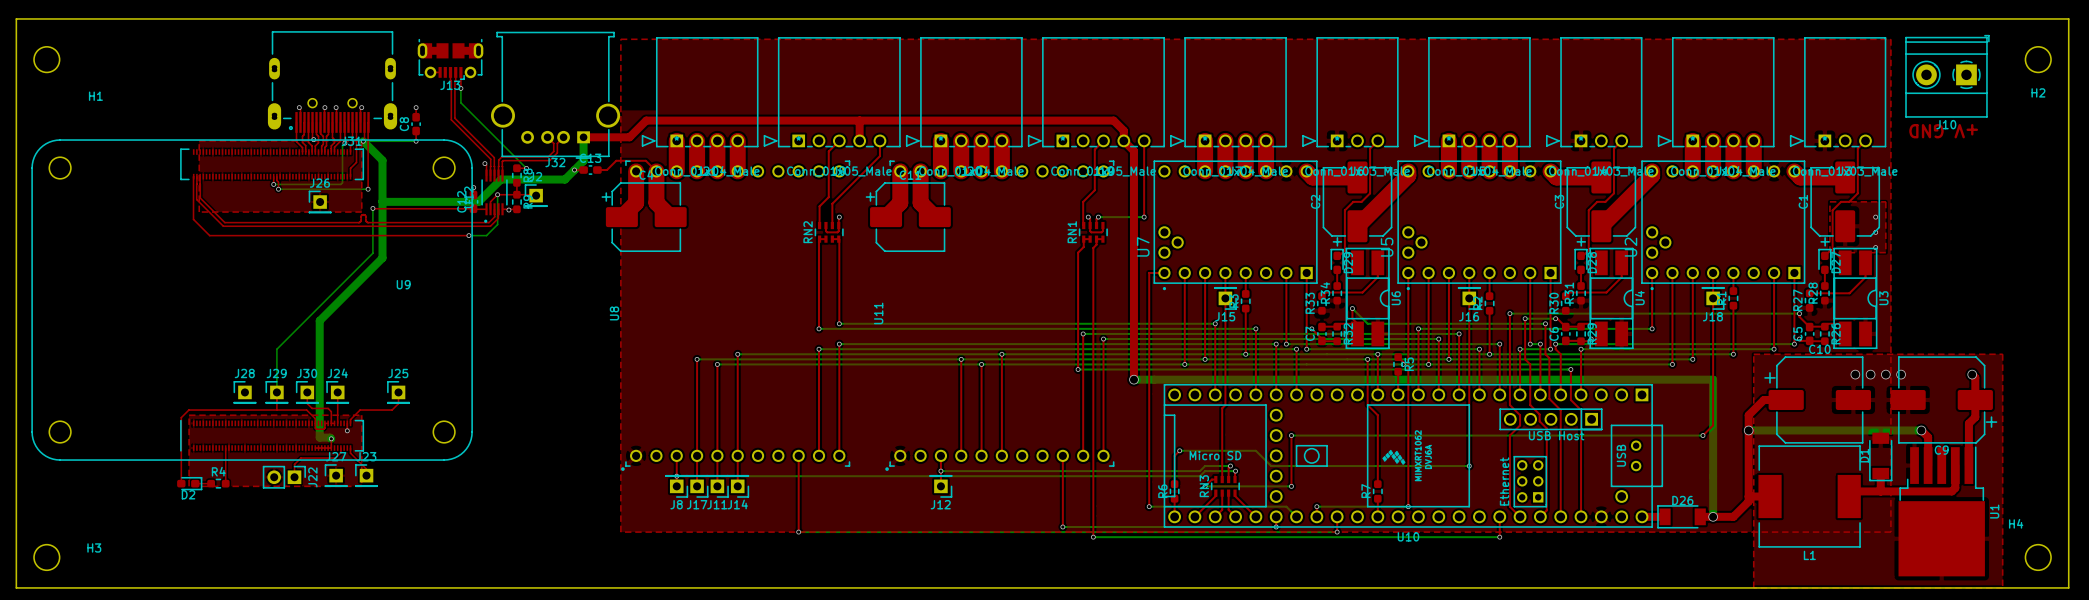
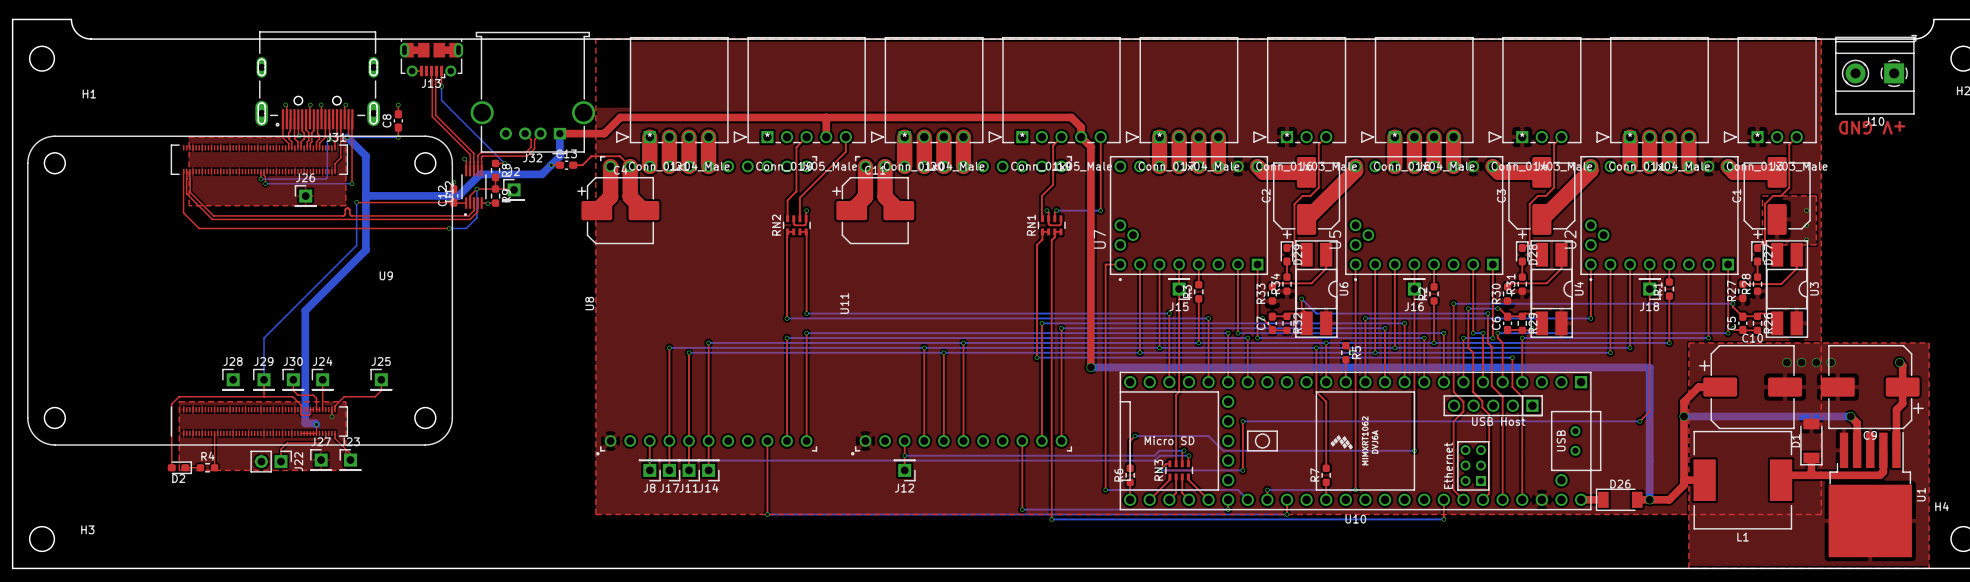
board edge: (77, 18) (2007, 18) -> (71, 19) (77, 33) (91, 39) (1914, 39) (1928, 33) (1933, 19)

